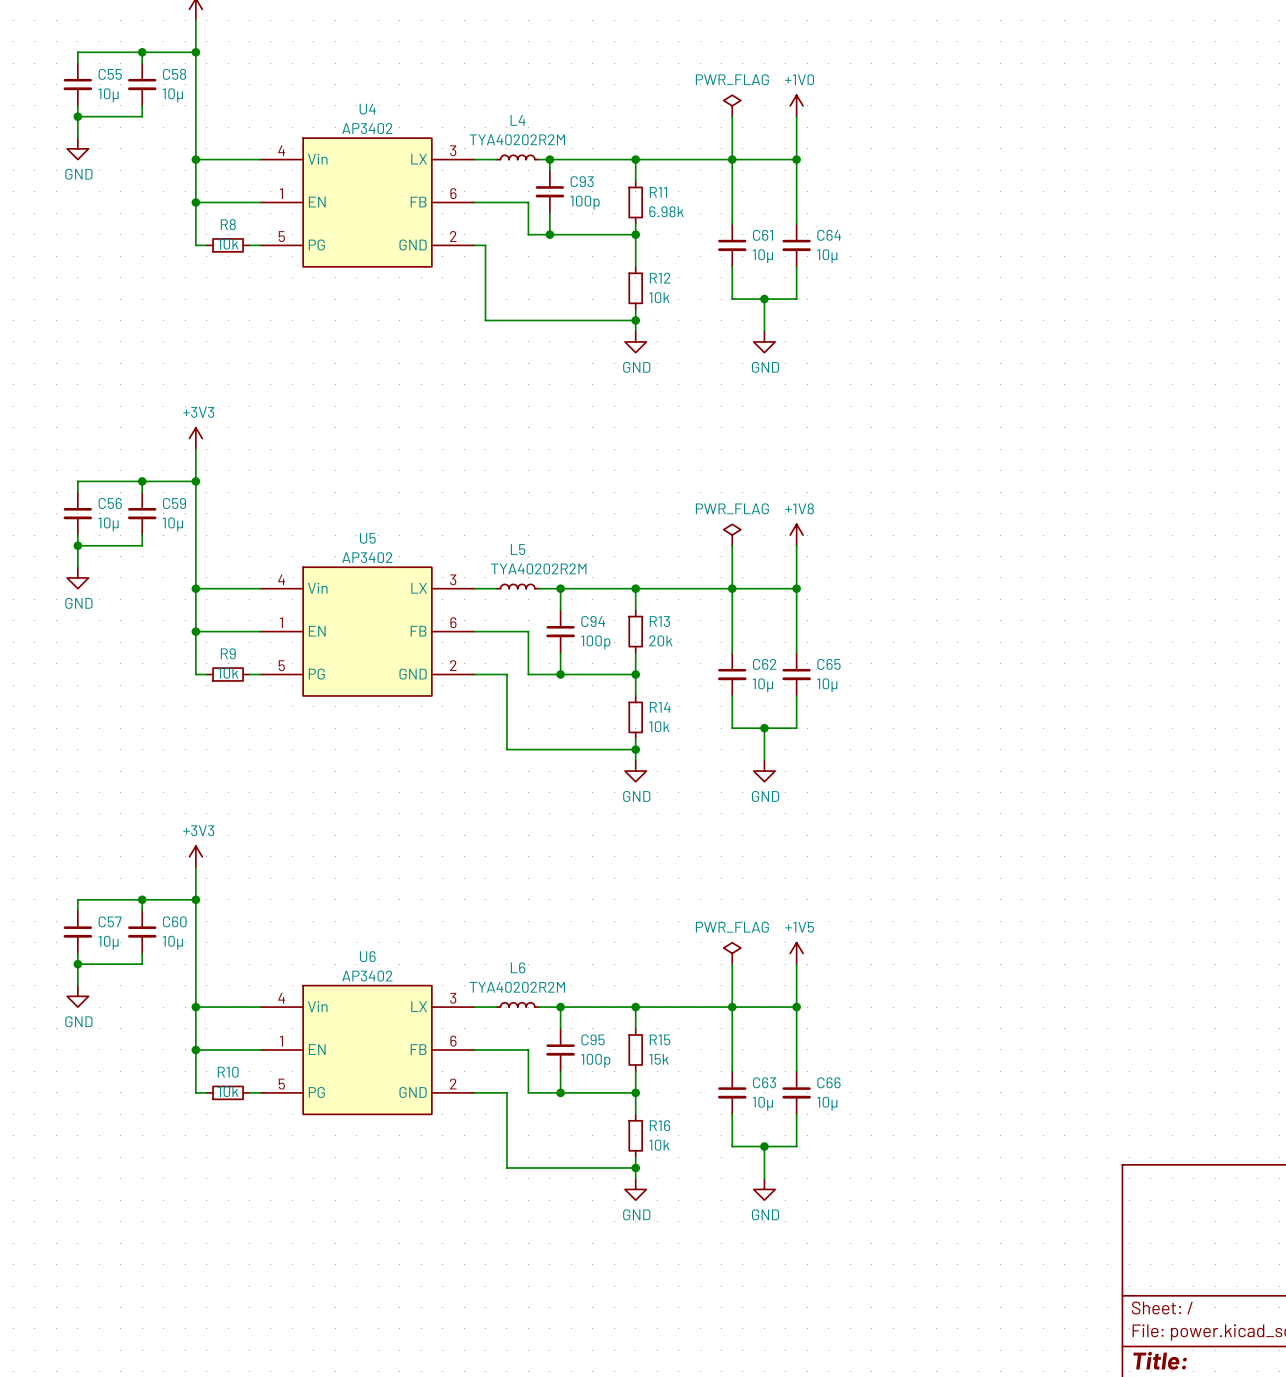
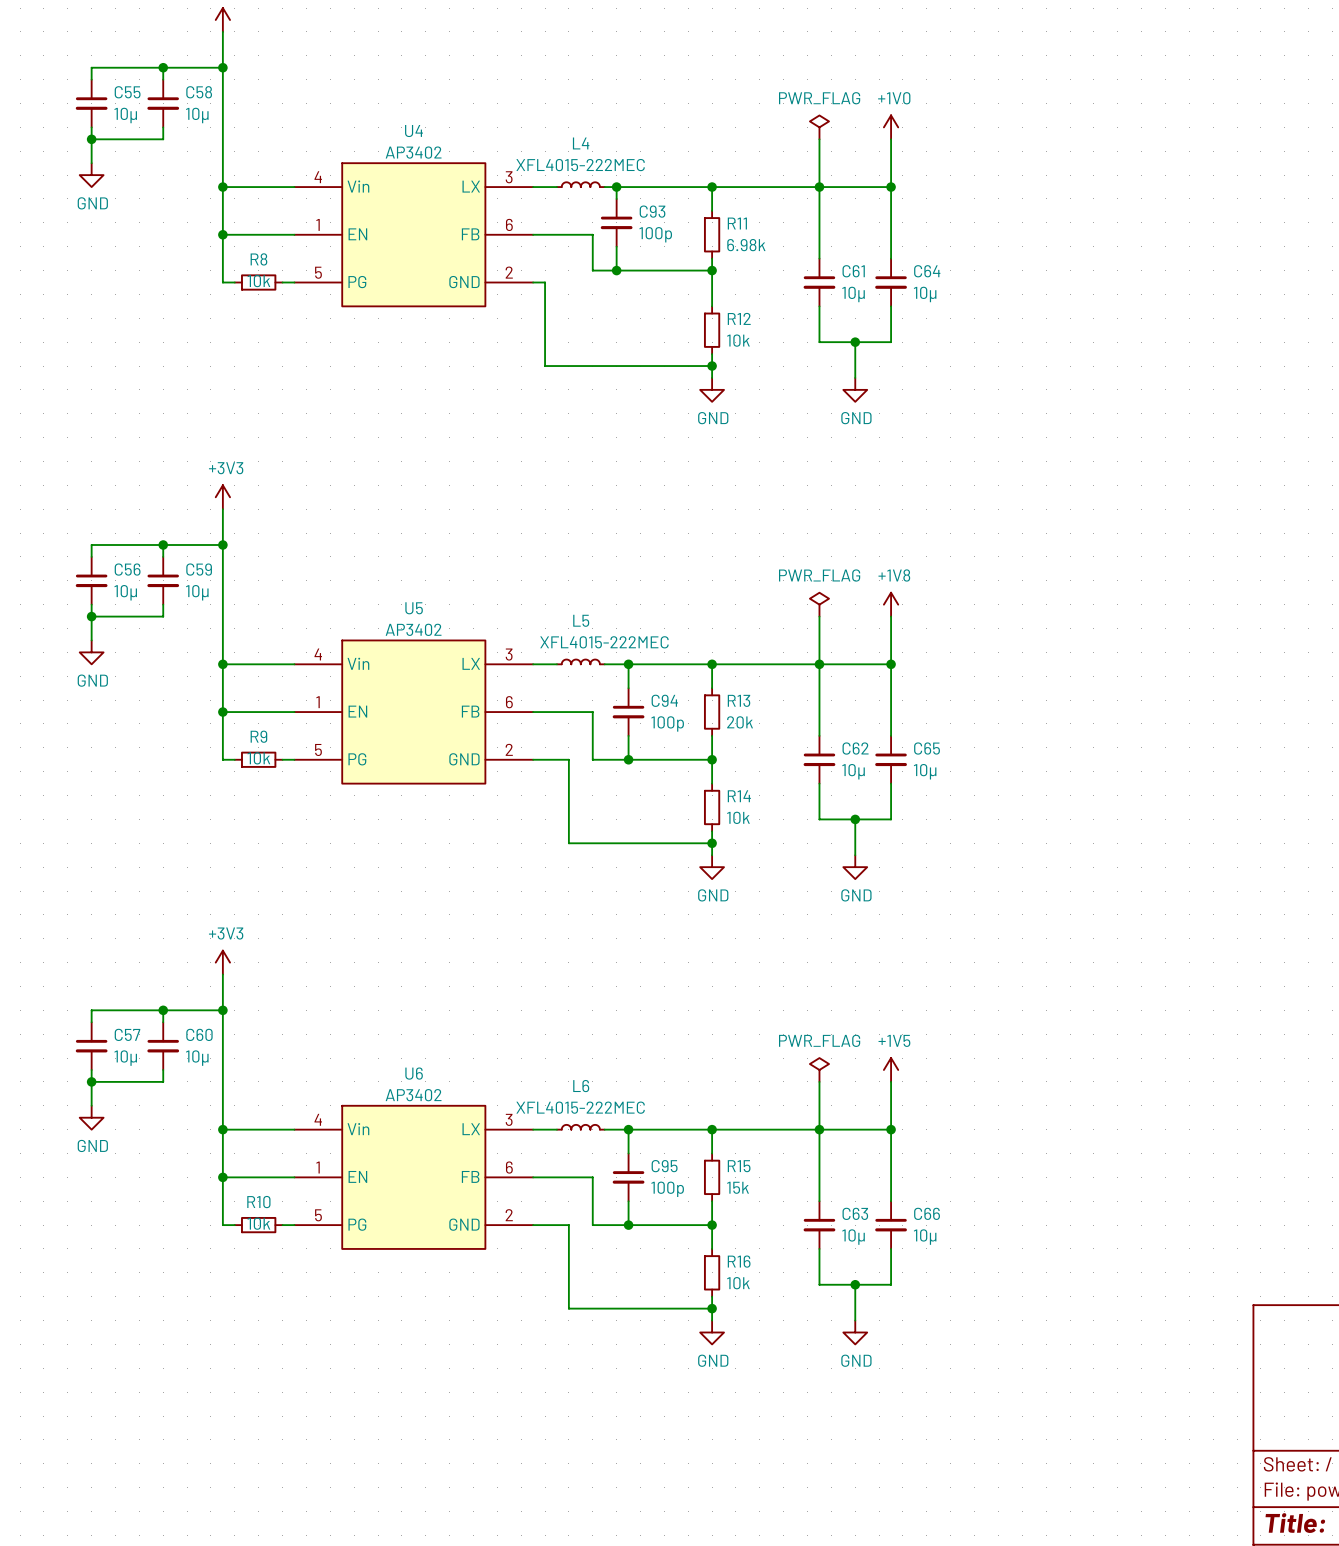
L4 value: TYA40202R2M (517, 139) -> XFL4015-222MEC (580, 165)
L5 value: TYA40202R2M (538, 568) -> XFL4015-222MEC (604, 642)
L6 value: TYA40202R2M (517, 987) -> XFL4015-222MEC (580, 1107)

